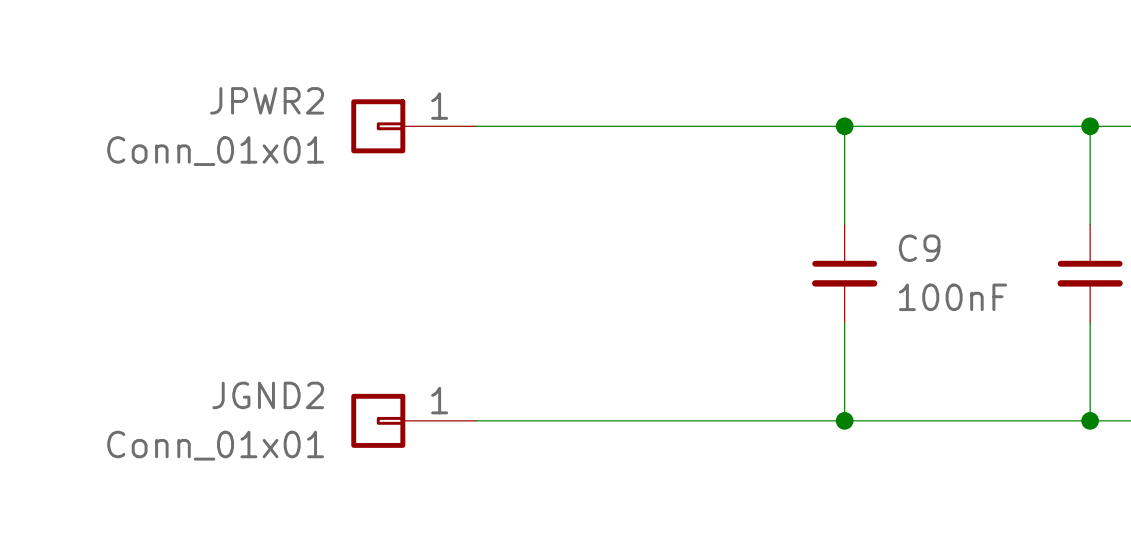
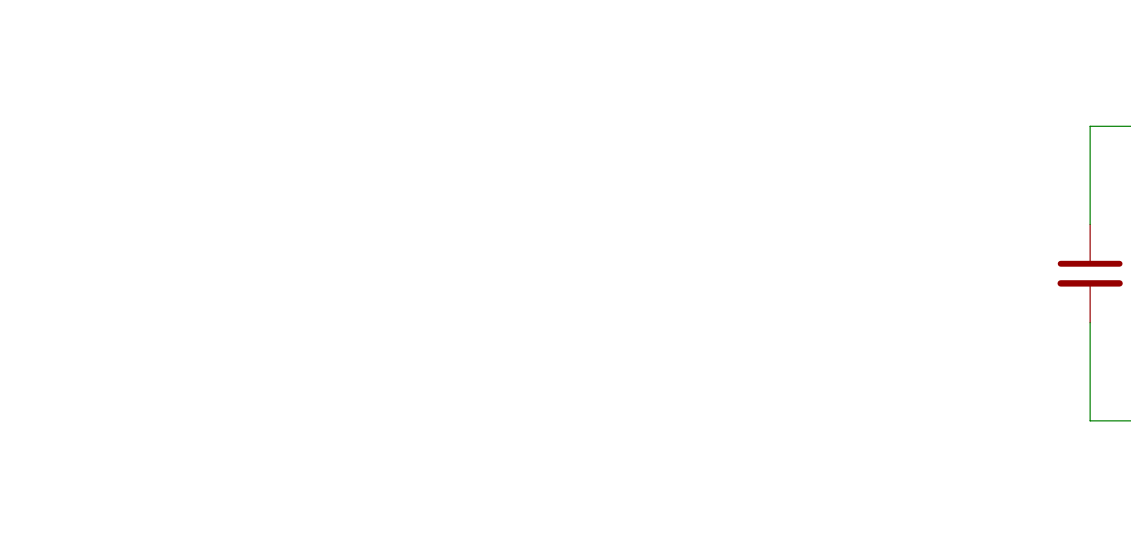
JPWR2: Conn_01x01 (413, 126) -> none
wire: (476, 126) (1090, 126) -> none
wire: (844, 126) (844, 224) -> none
junction: (844, 126) -> none
junction: (1090, 126) -> none
C9: 100nF (844, 273) -> none
wire: (844, 322) (844, 420) -> none
JGND2: Conn_01x01 (413, 420) -> none
wire: (476, 420) (1090, 420) -> none
junction: (844, 420) -> none
junction: (1090, 420) -> none

